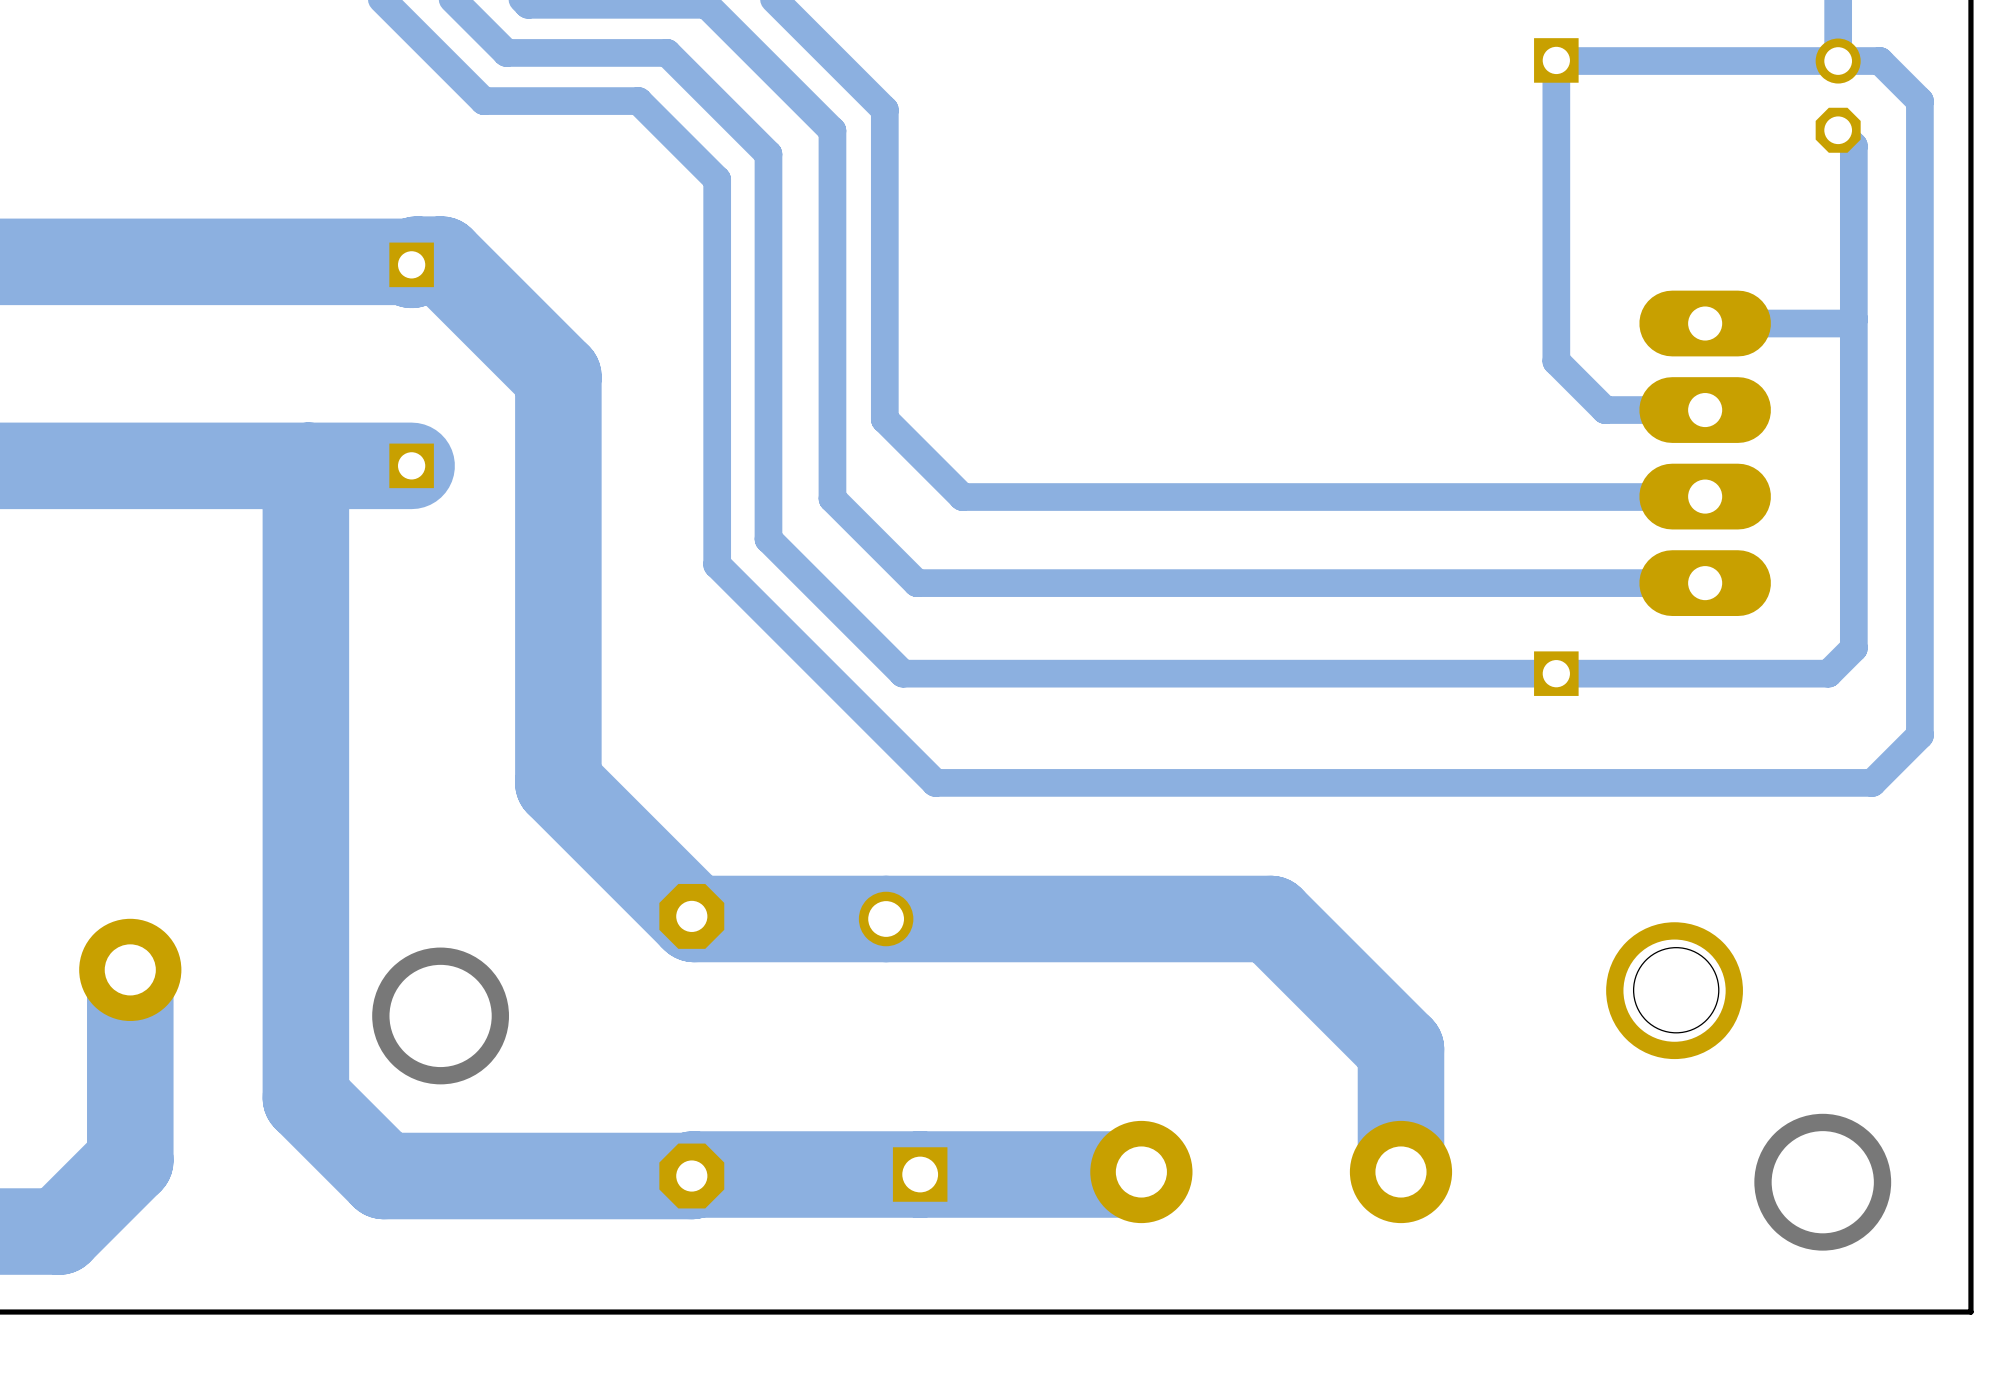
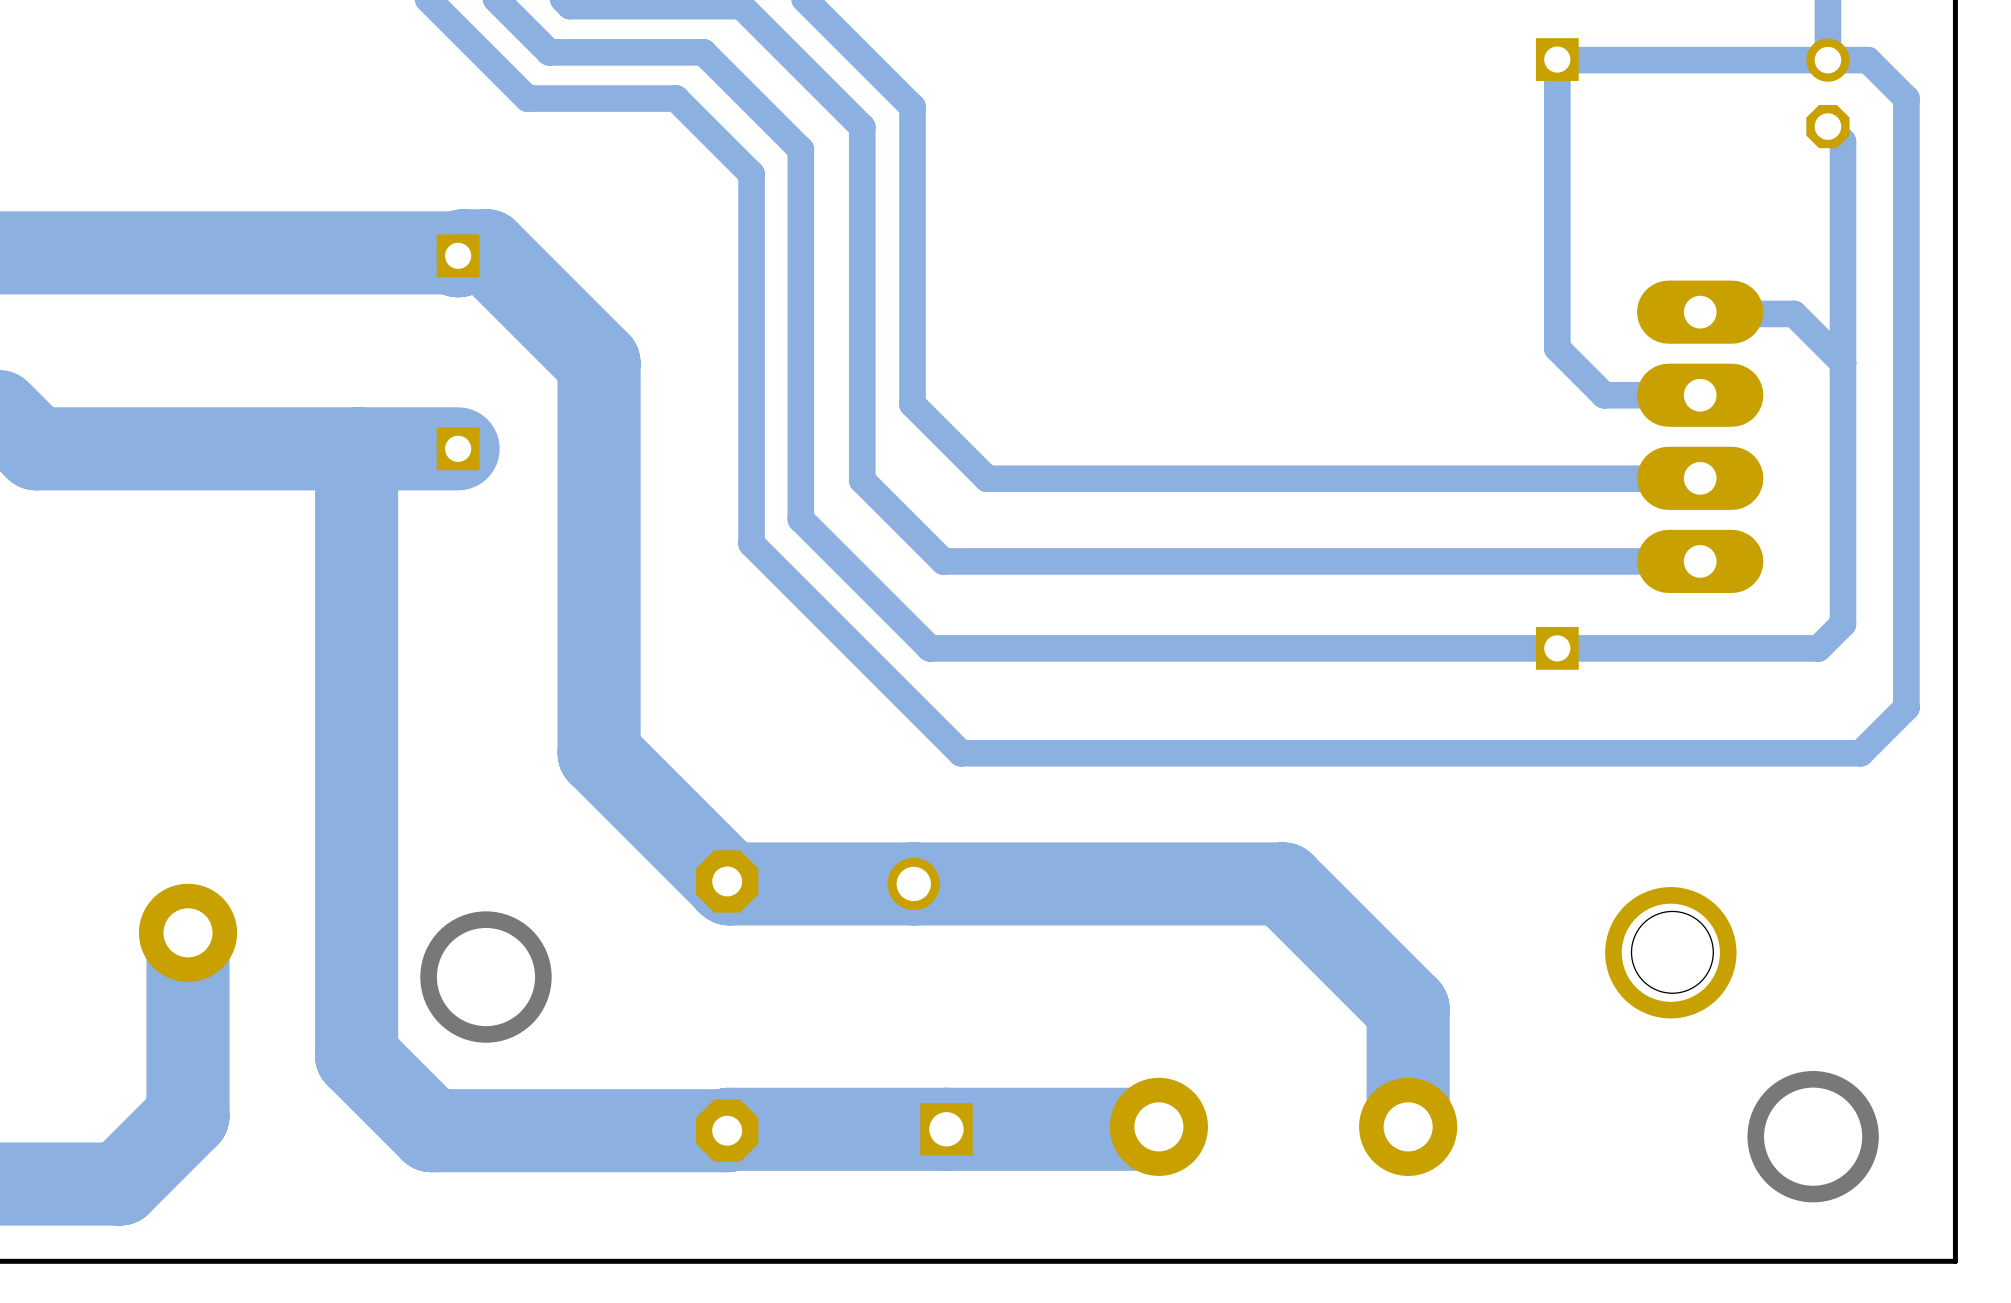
track: (1853, 319) (1849, 323) (1705, 323) -> none
track: none -> (1701, 313) (1793, 313) (1842, 362)

